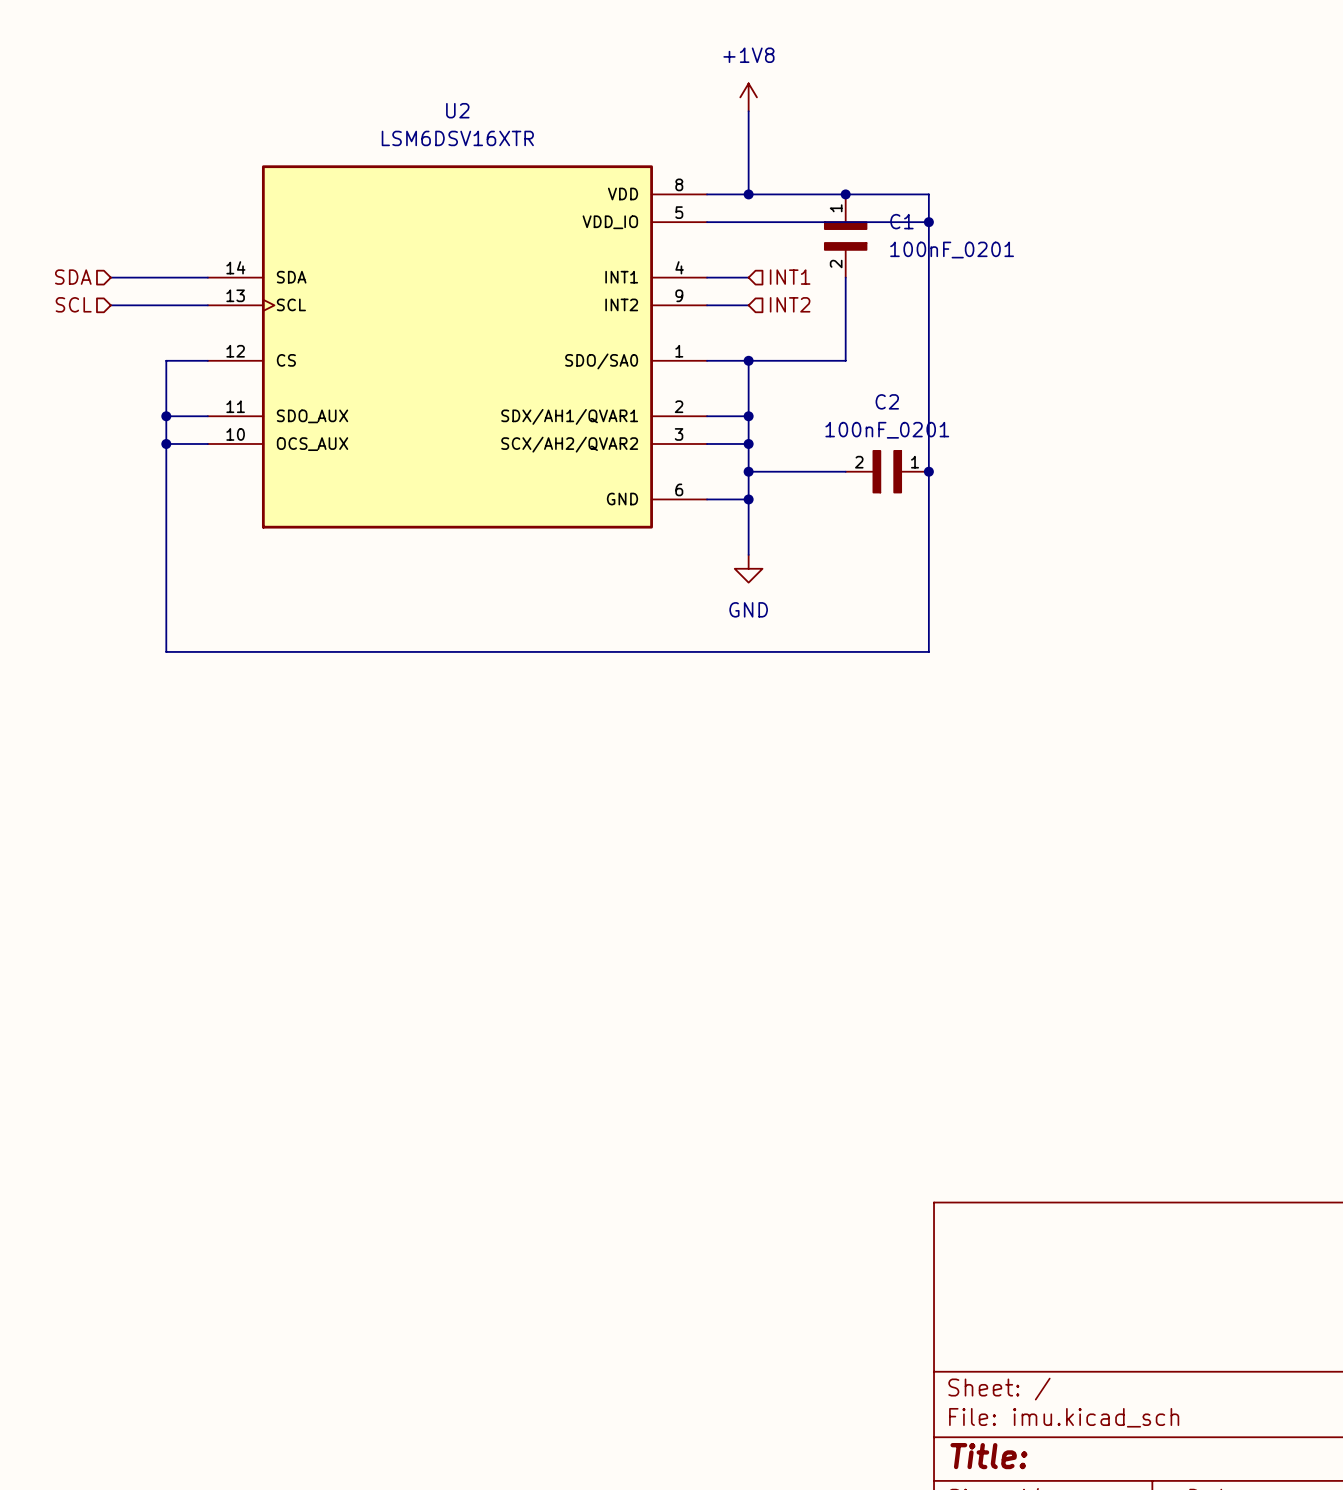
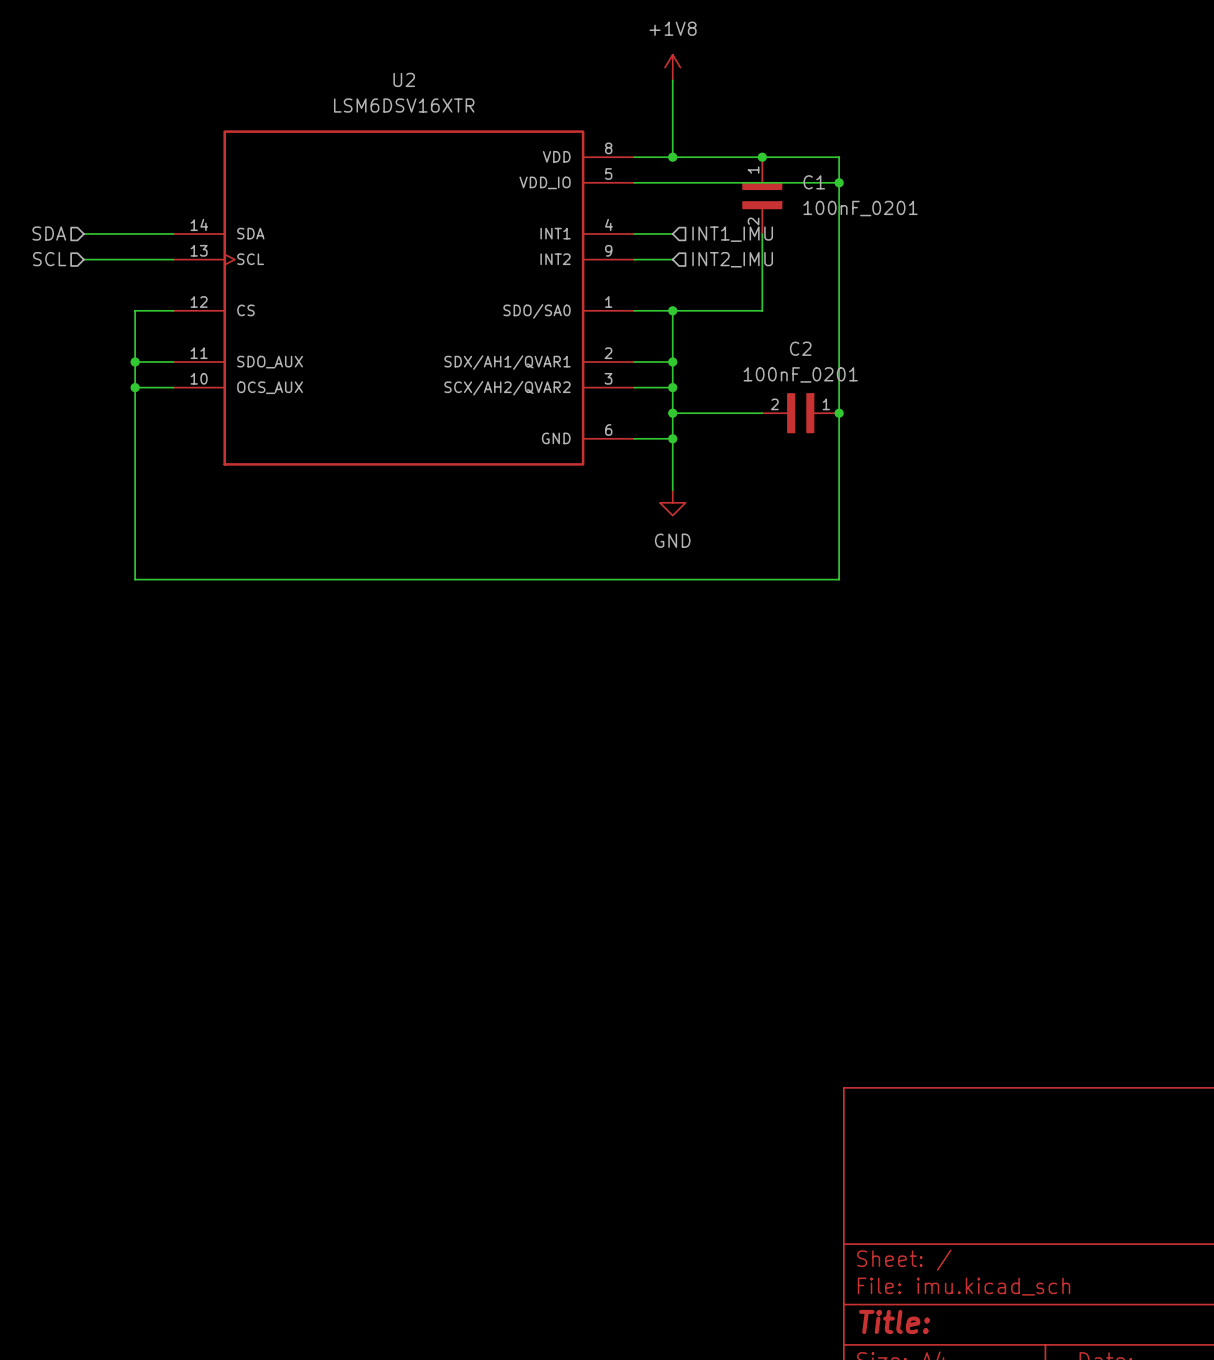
hierarchical label: INT1 (790, 277) -> INT1_IMU (732, 234)
hierarchical label: INT2 (790, 304) -> INT2_IMU (732, 259)

